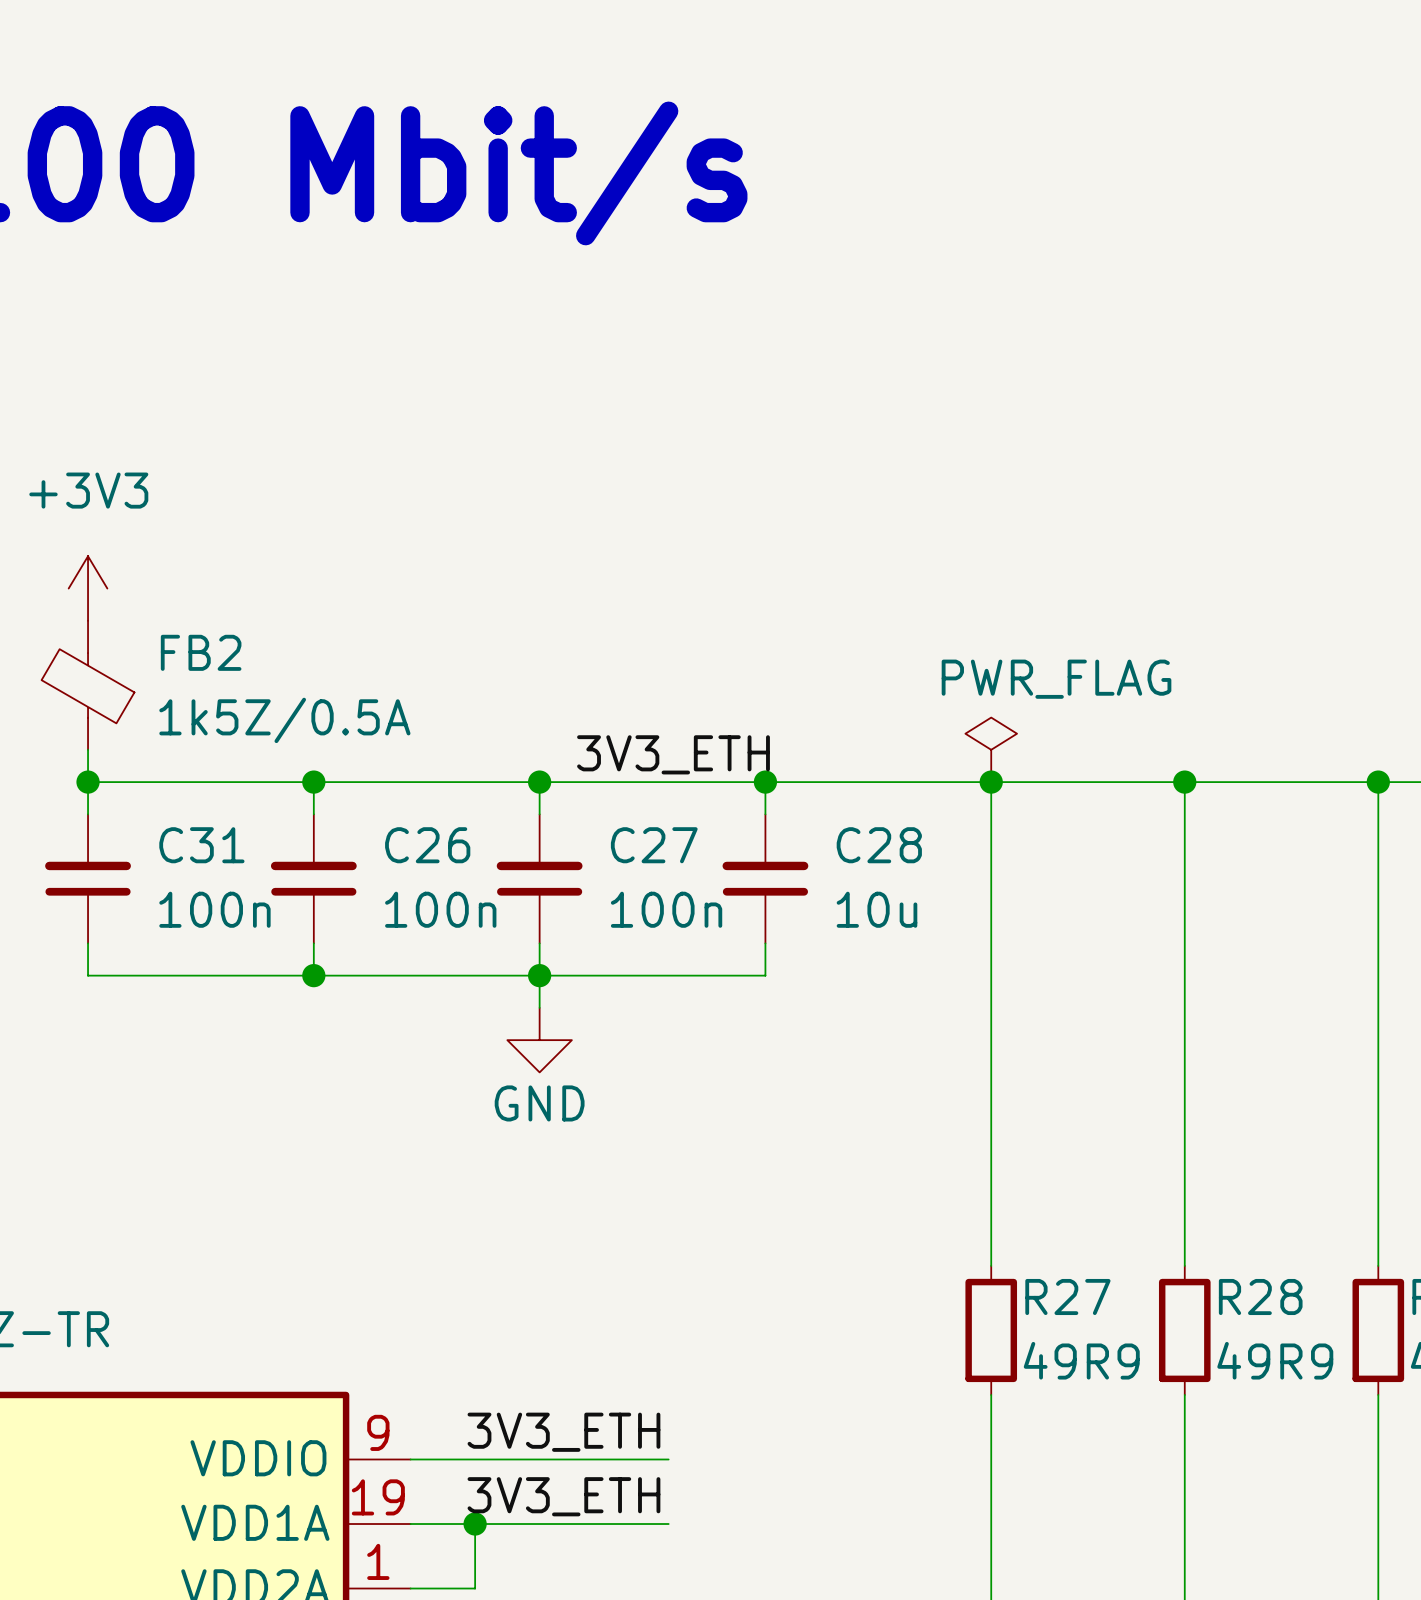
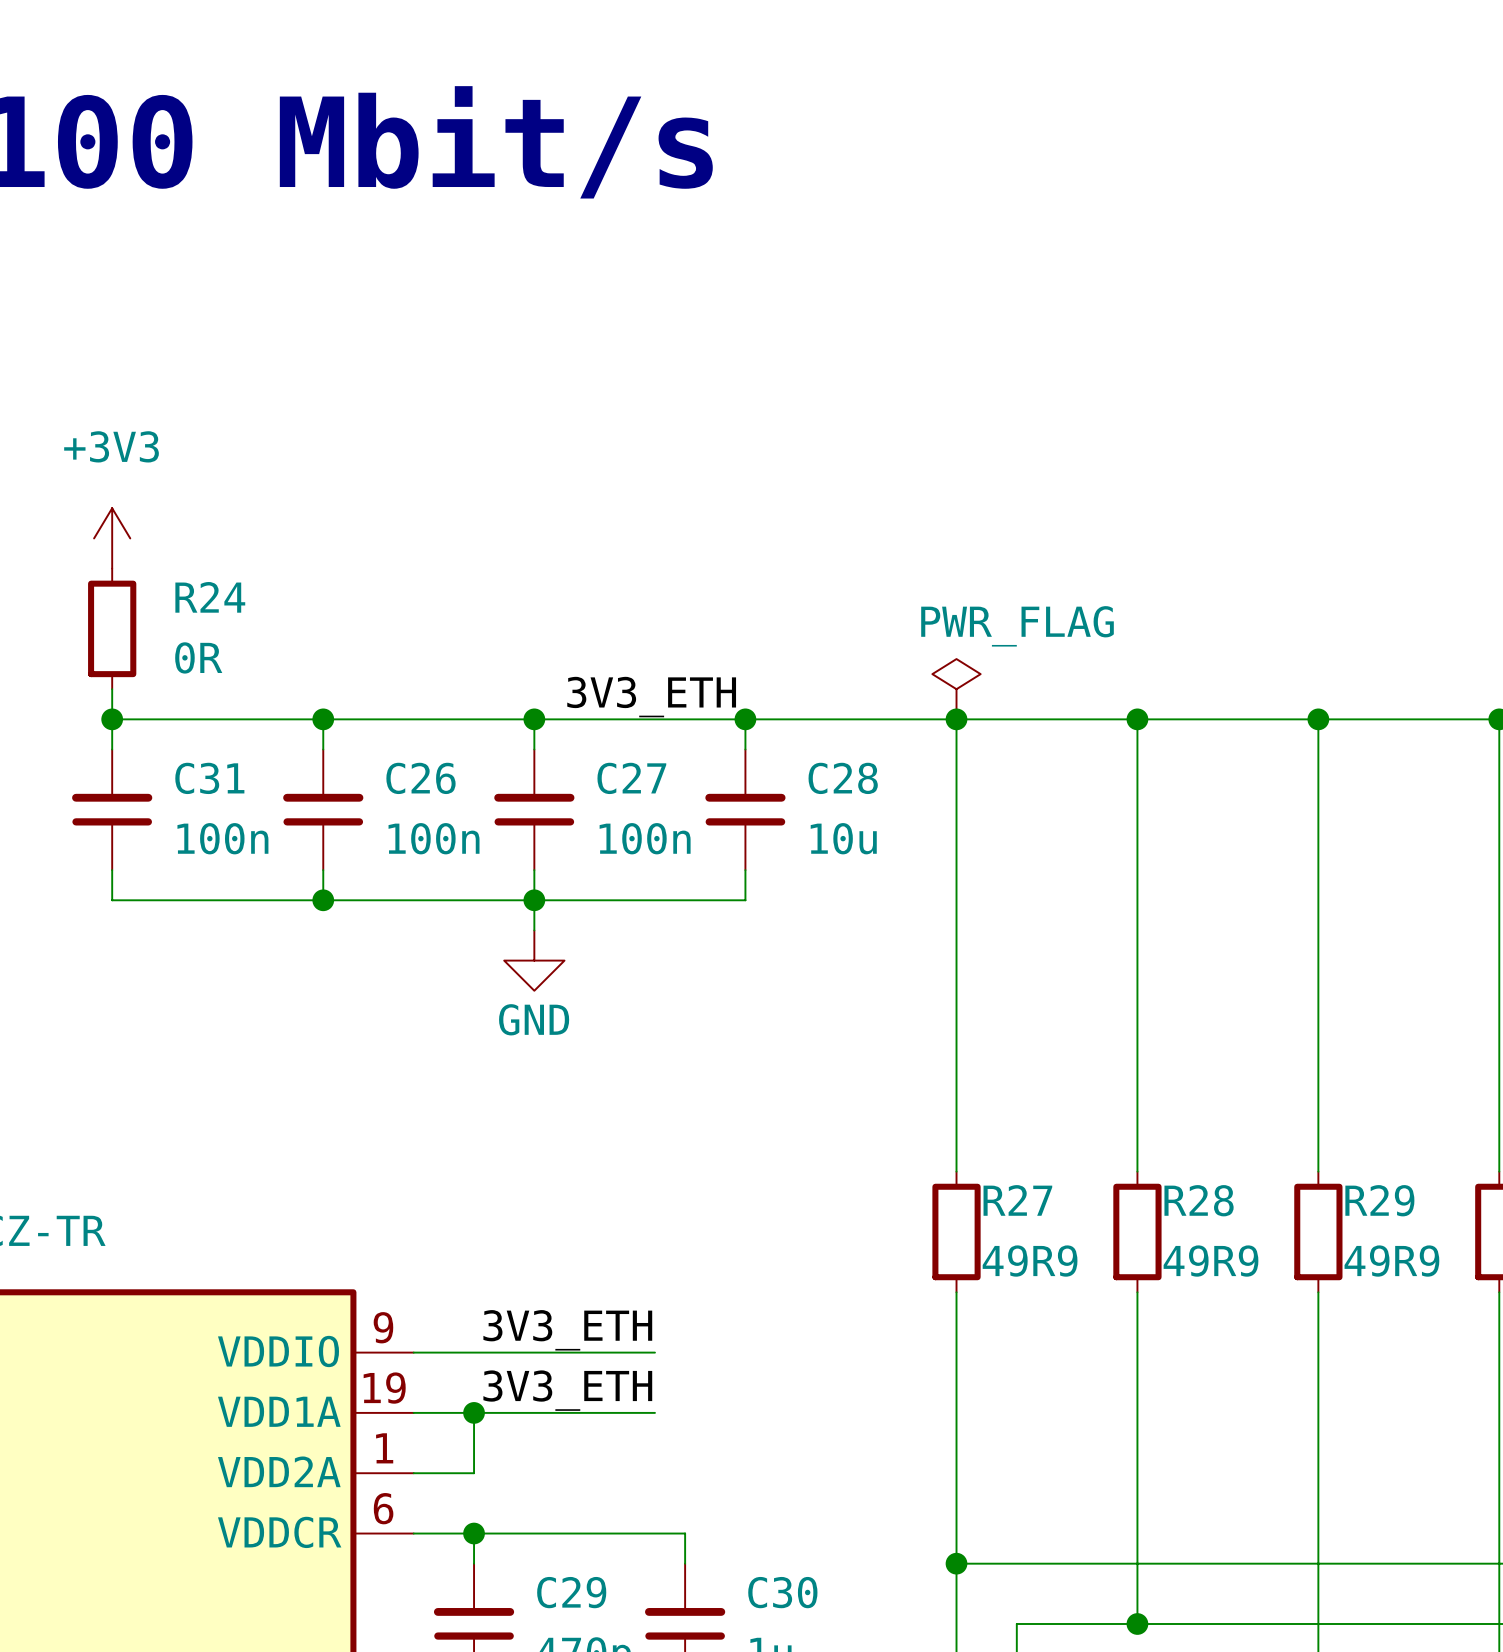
FB2: (88, 685) -> none
R24: none -> (112, 628)

